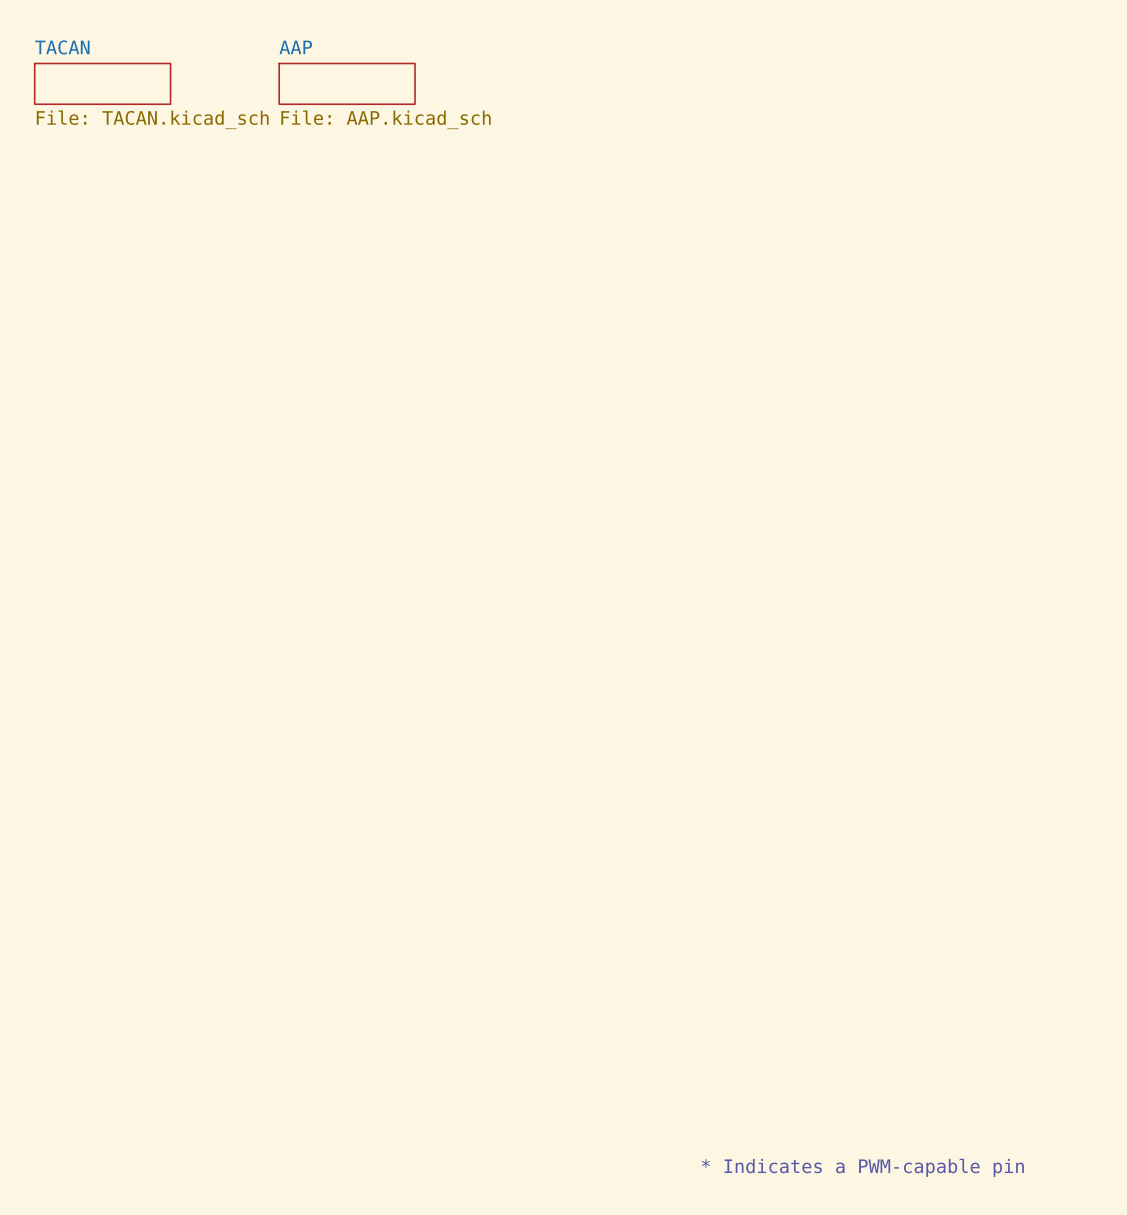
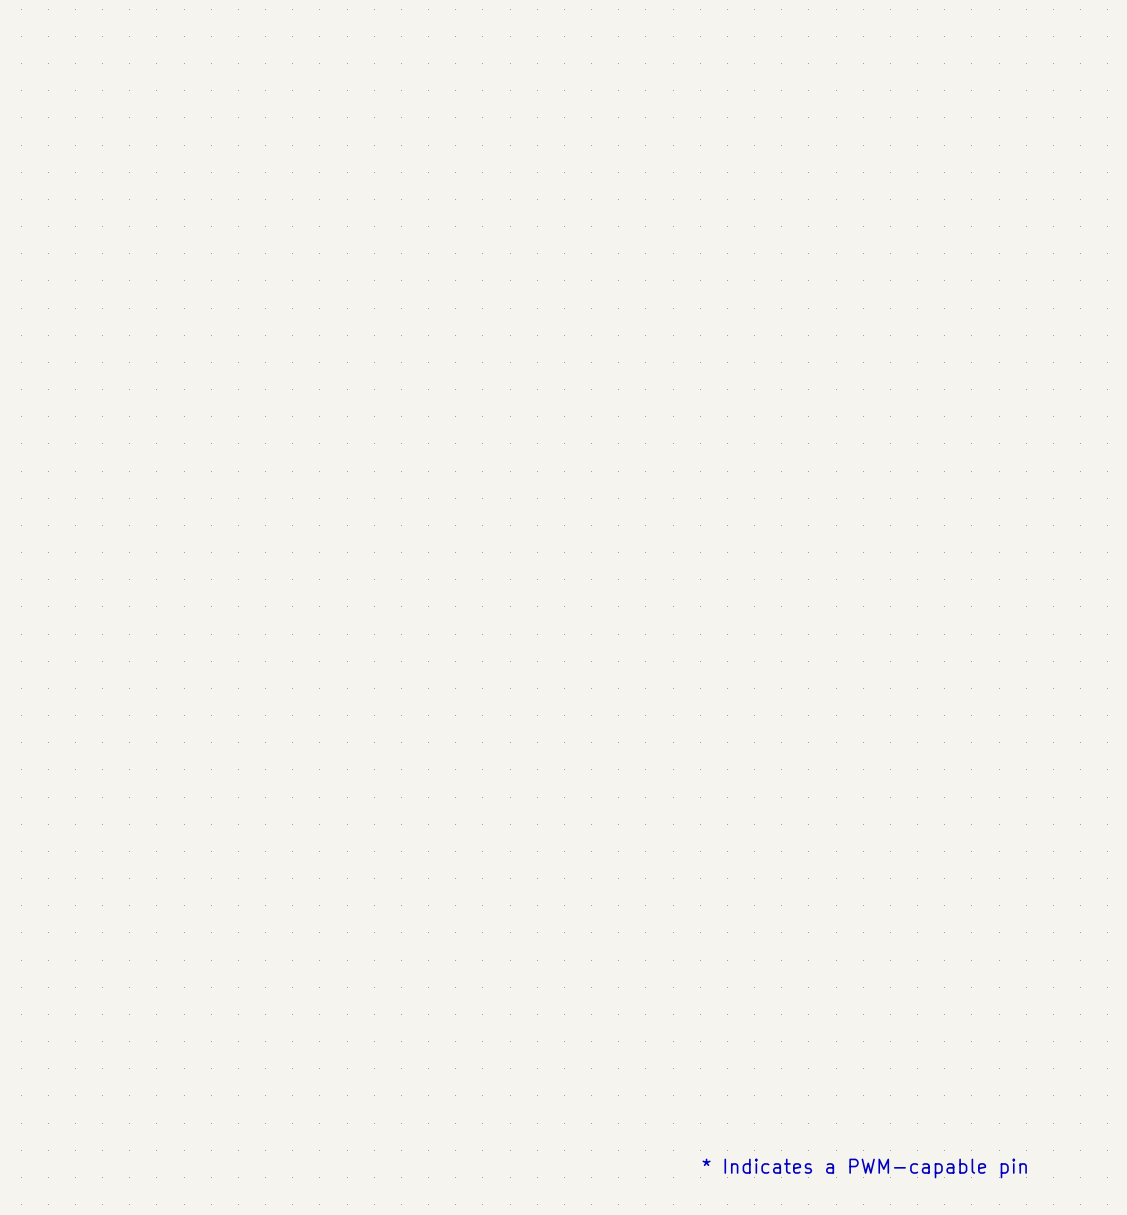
sheet TACAN: File: TACAN.kicad_sch (102, 83) -> none
sheet AAP: File: AAP.kicad_sch (347, 83) -> none

